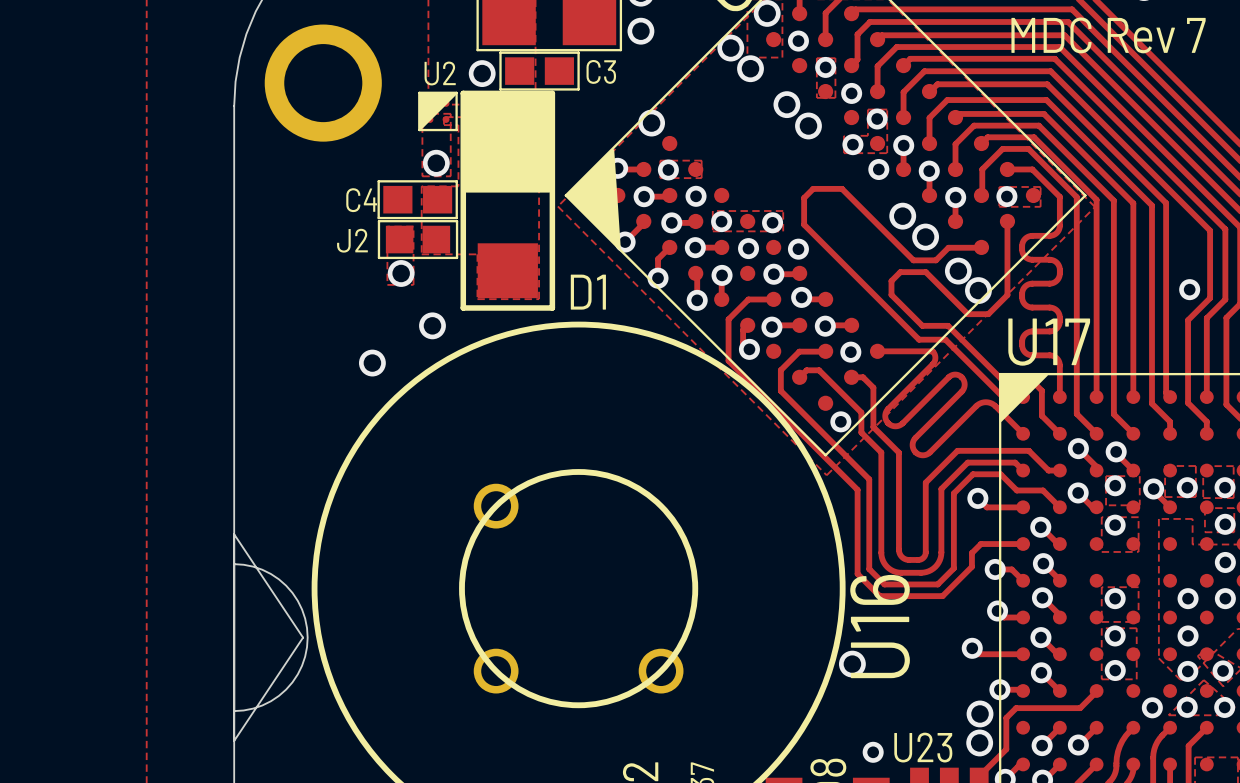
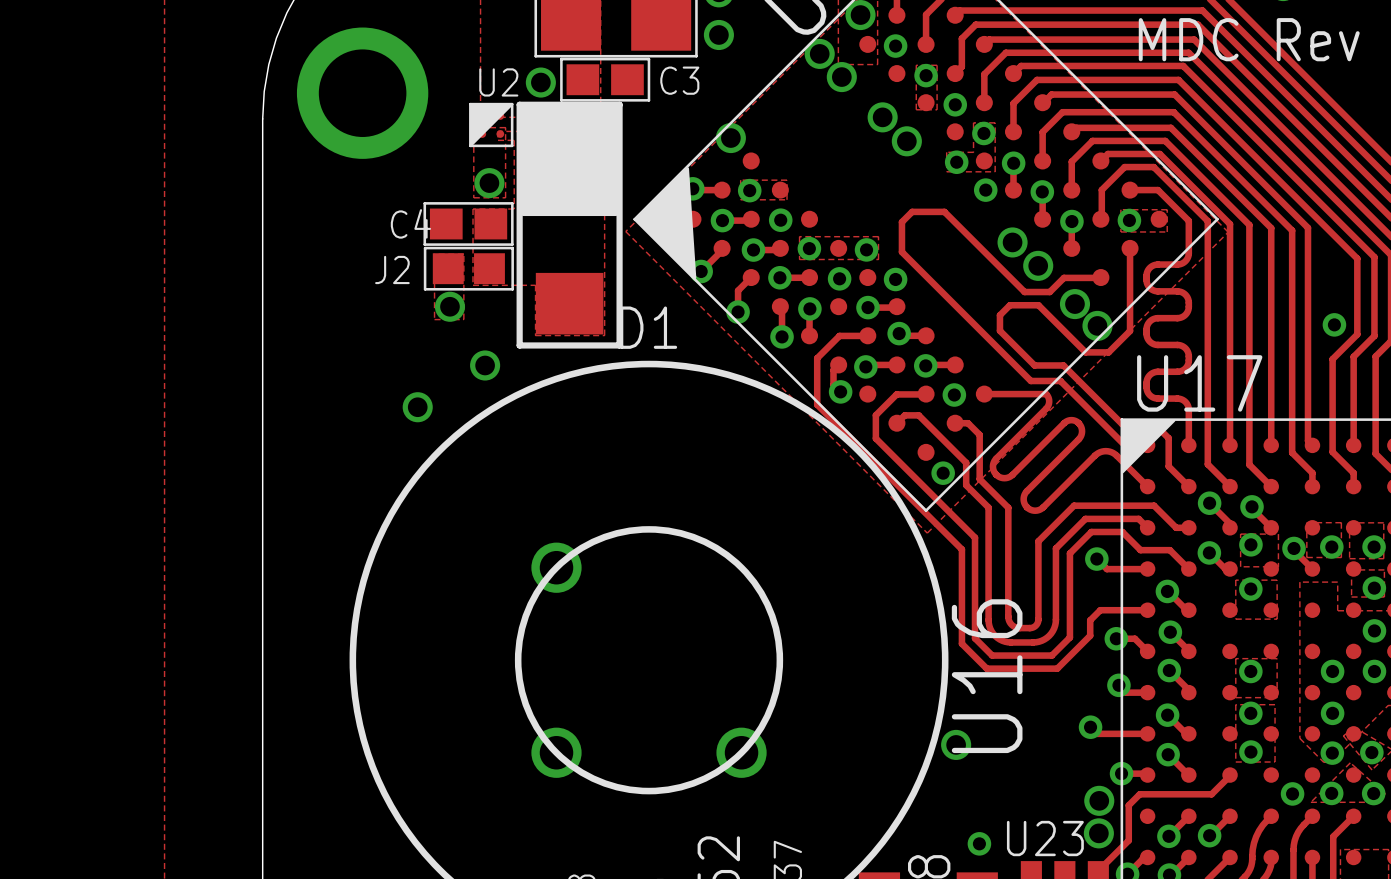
board edge: (234, 534) (303, 637) (234, 740) -> none
board edge: (234, 564) (262, 569) (286, 585) (302, 609) (307, 637) (302, 665) (286, 689) (262, 705) (234, 711) -> none

